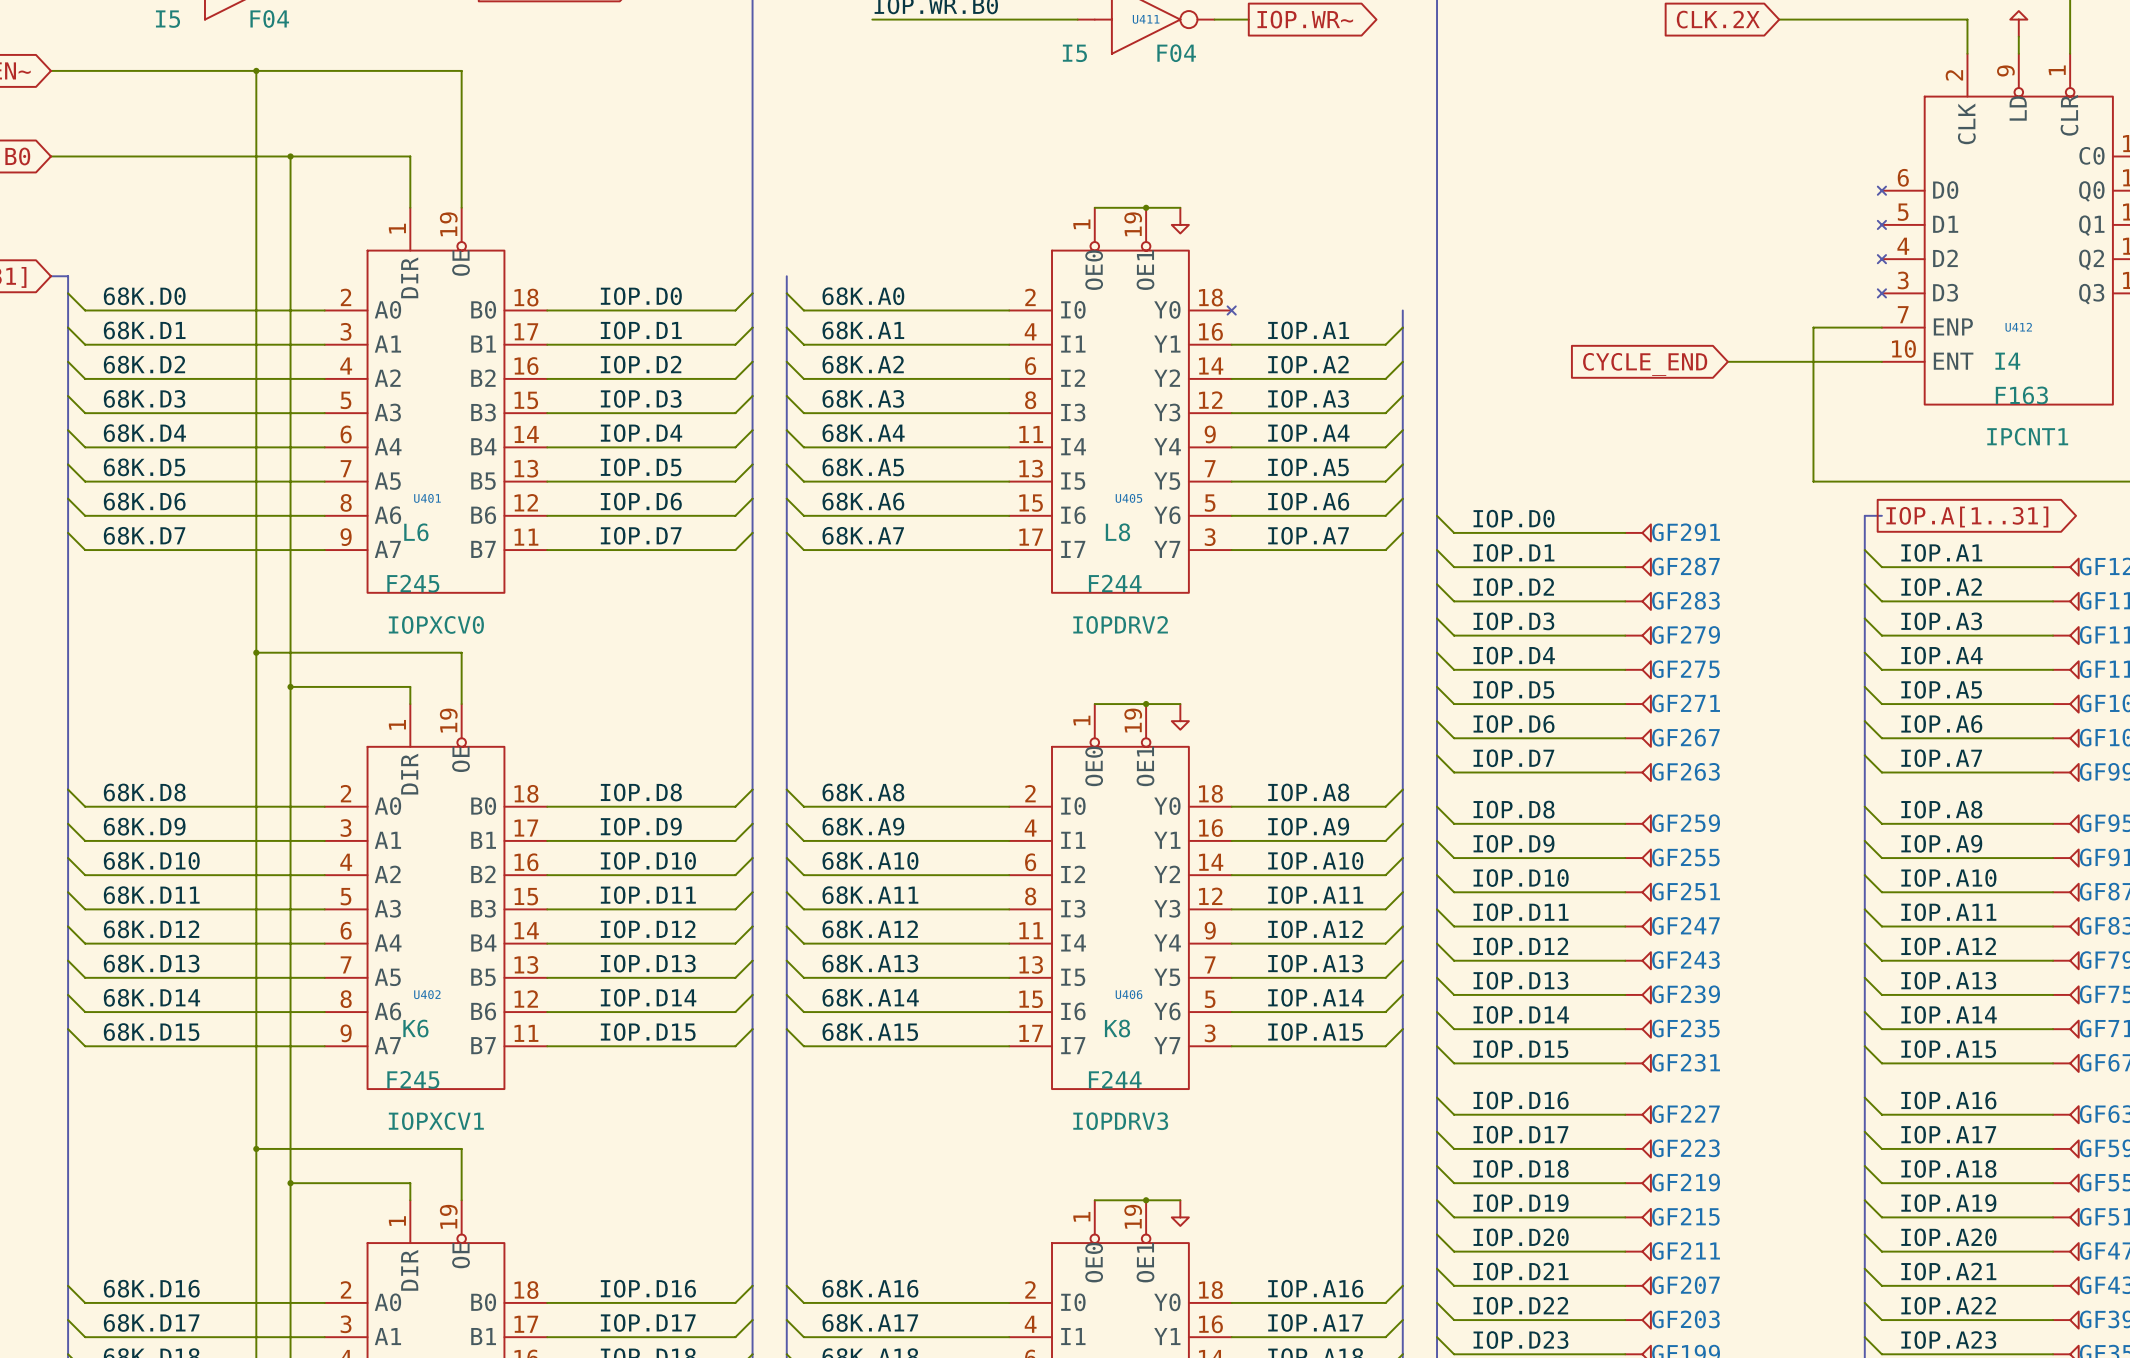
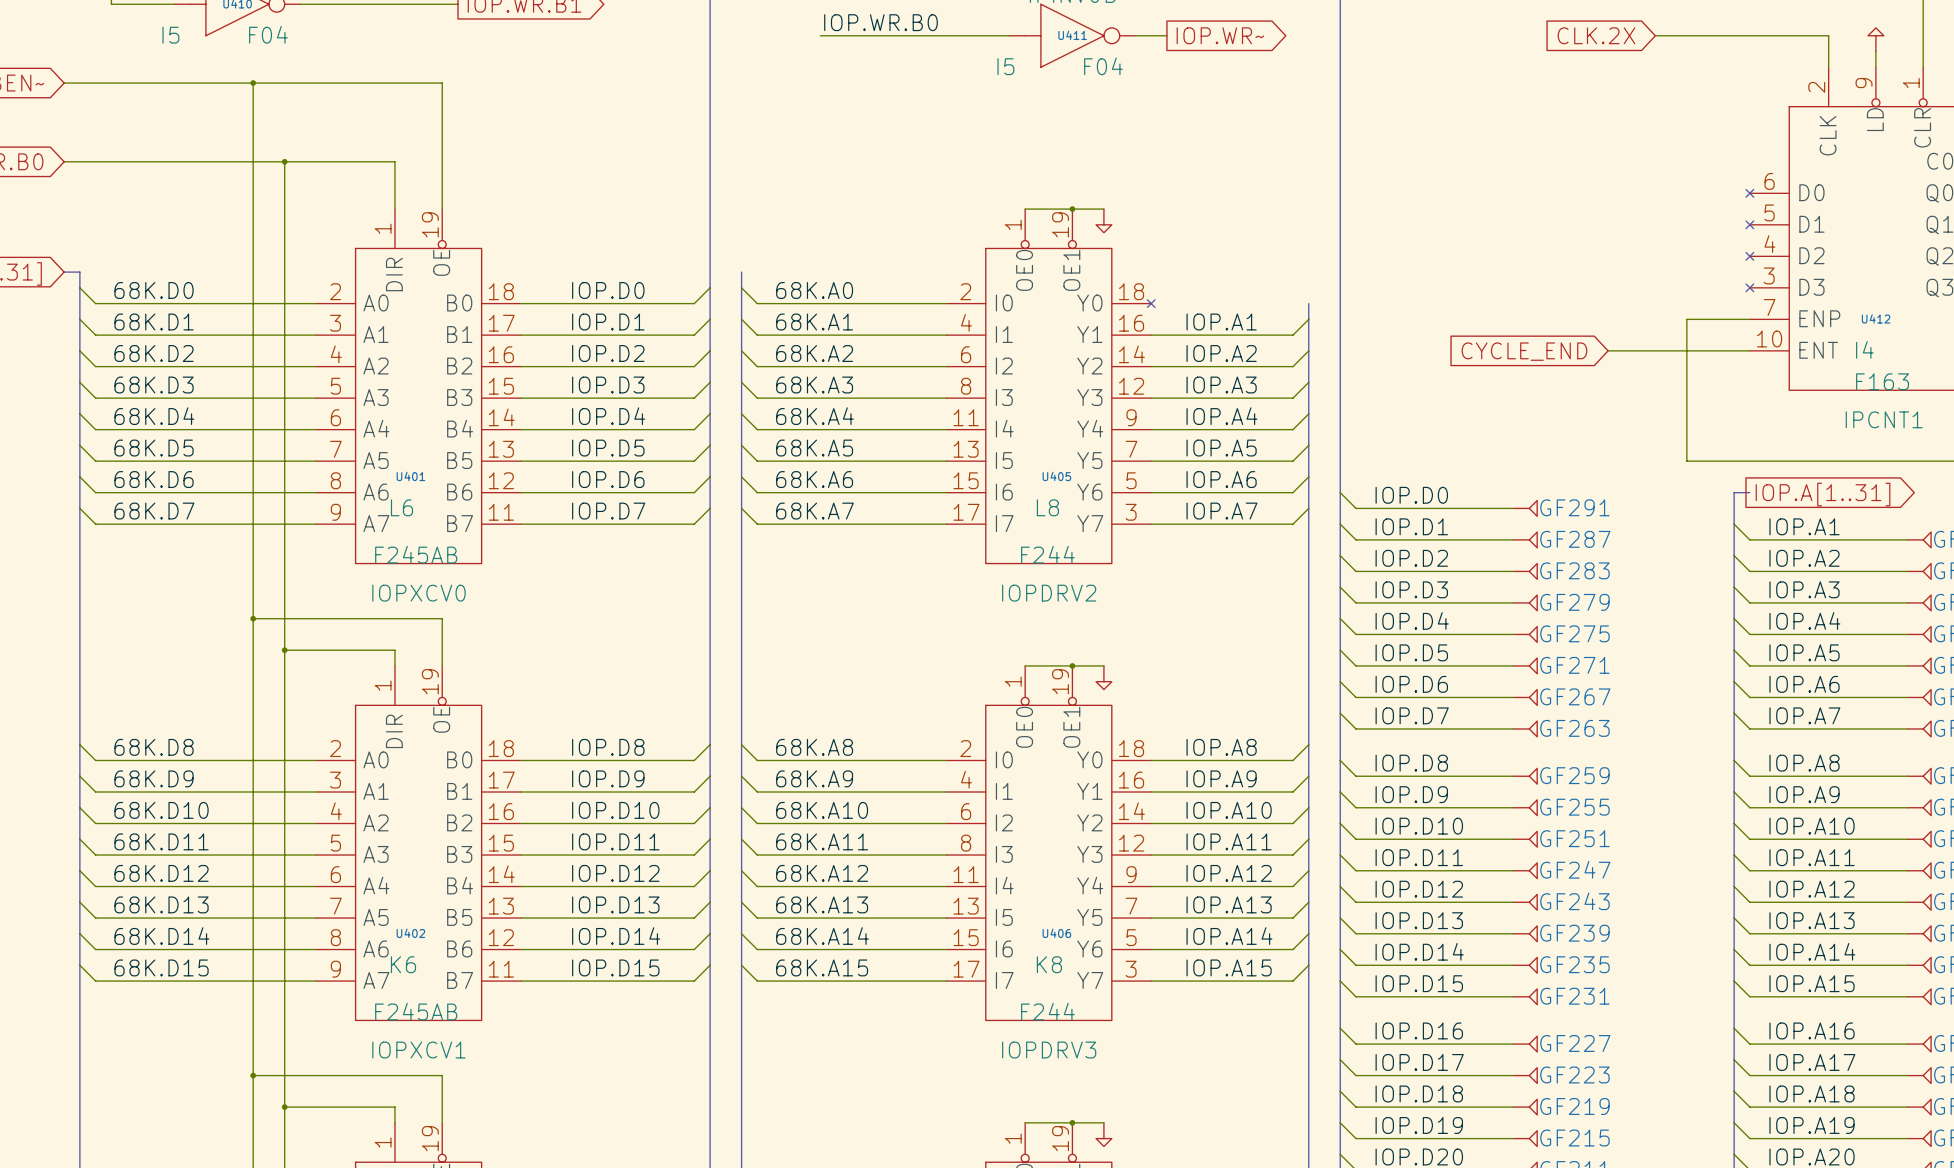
U401 value: F245 (413, 583) -> F245AB (416, 554)
U402 value: F245 (413, 1079) -> F245AB (416, 1011)

